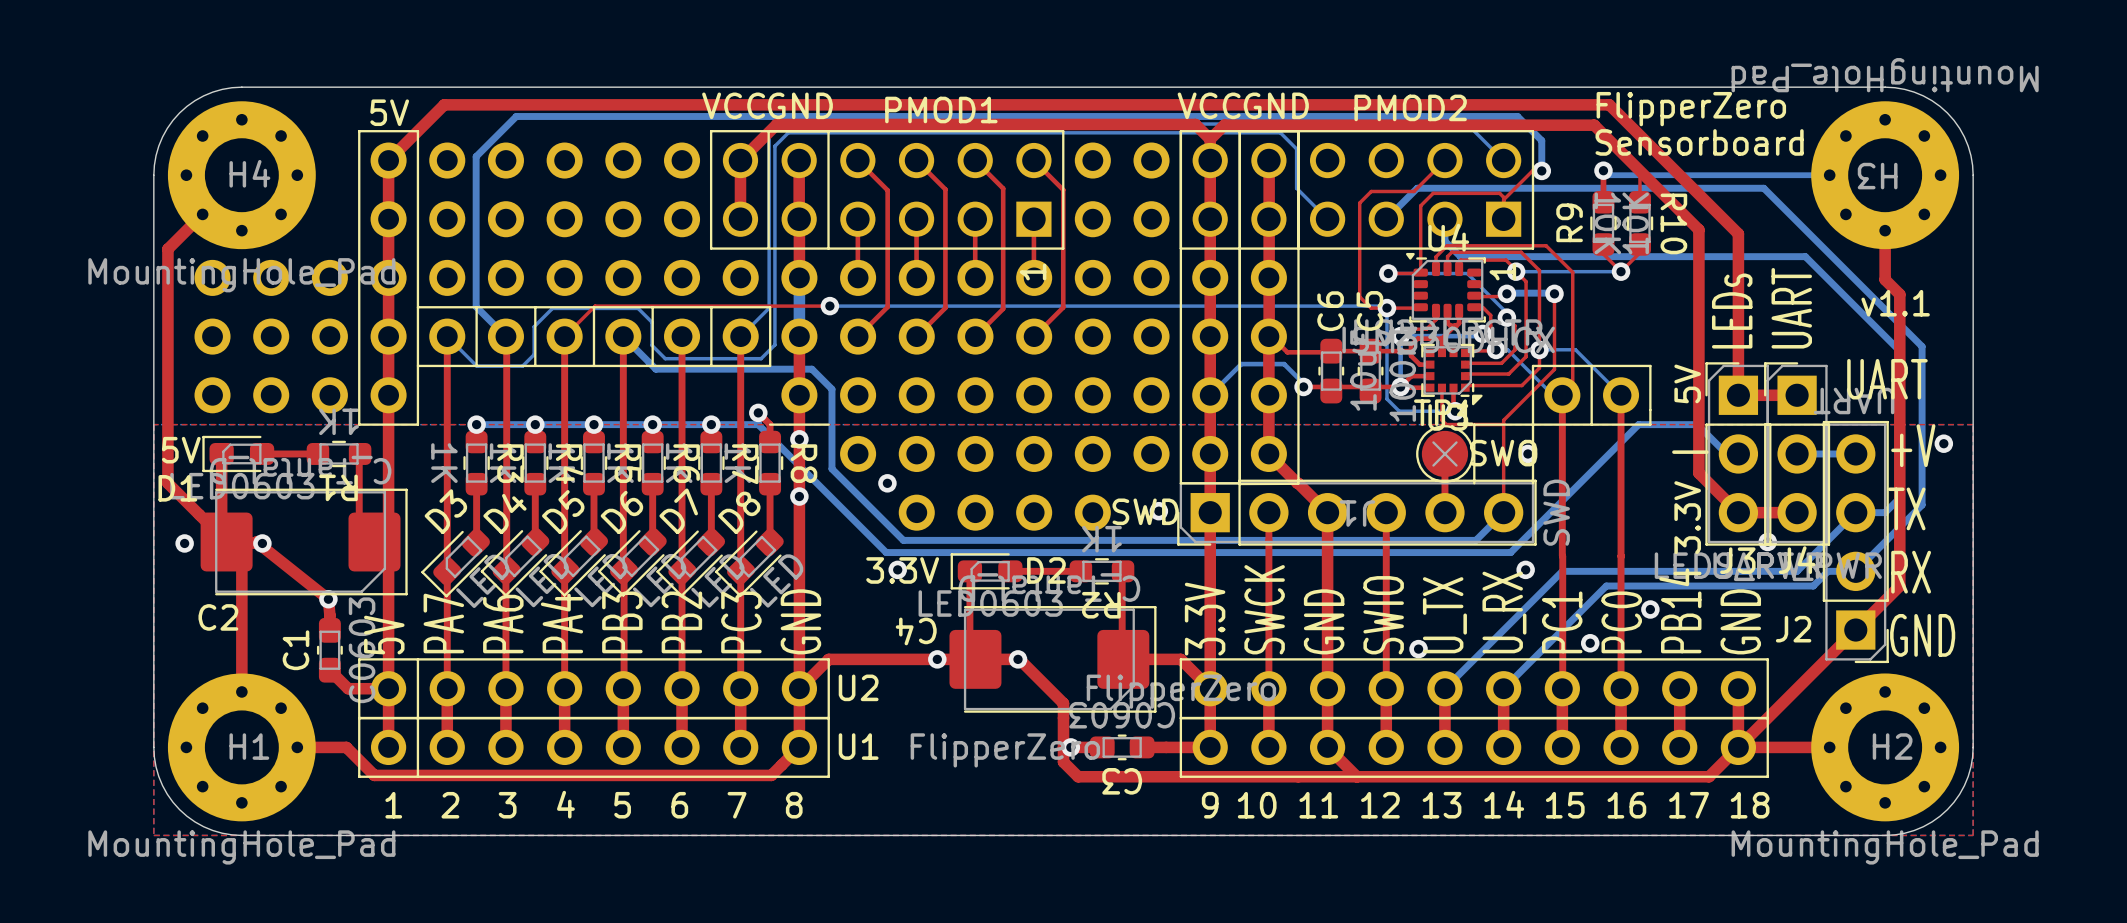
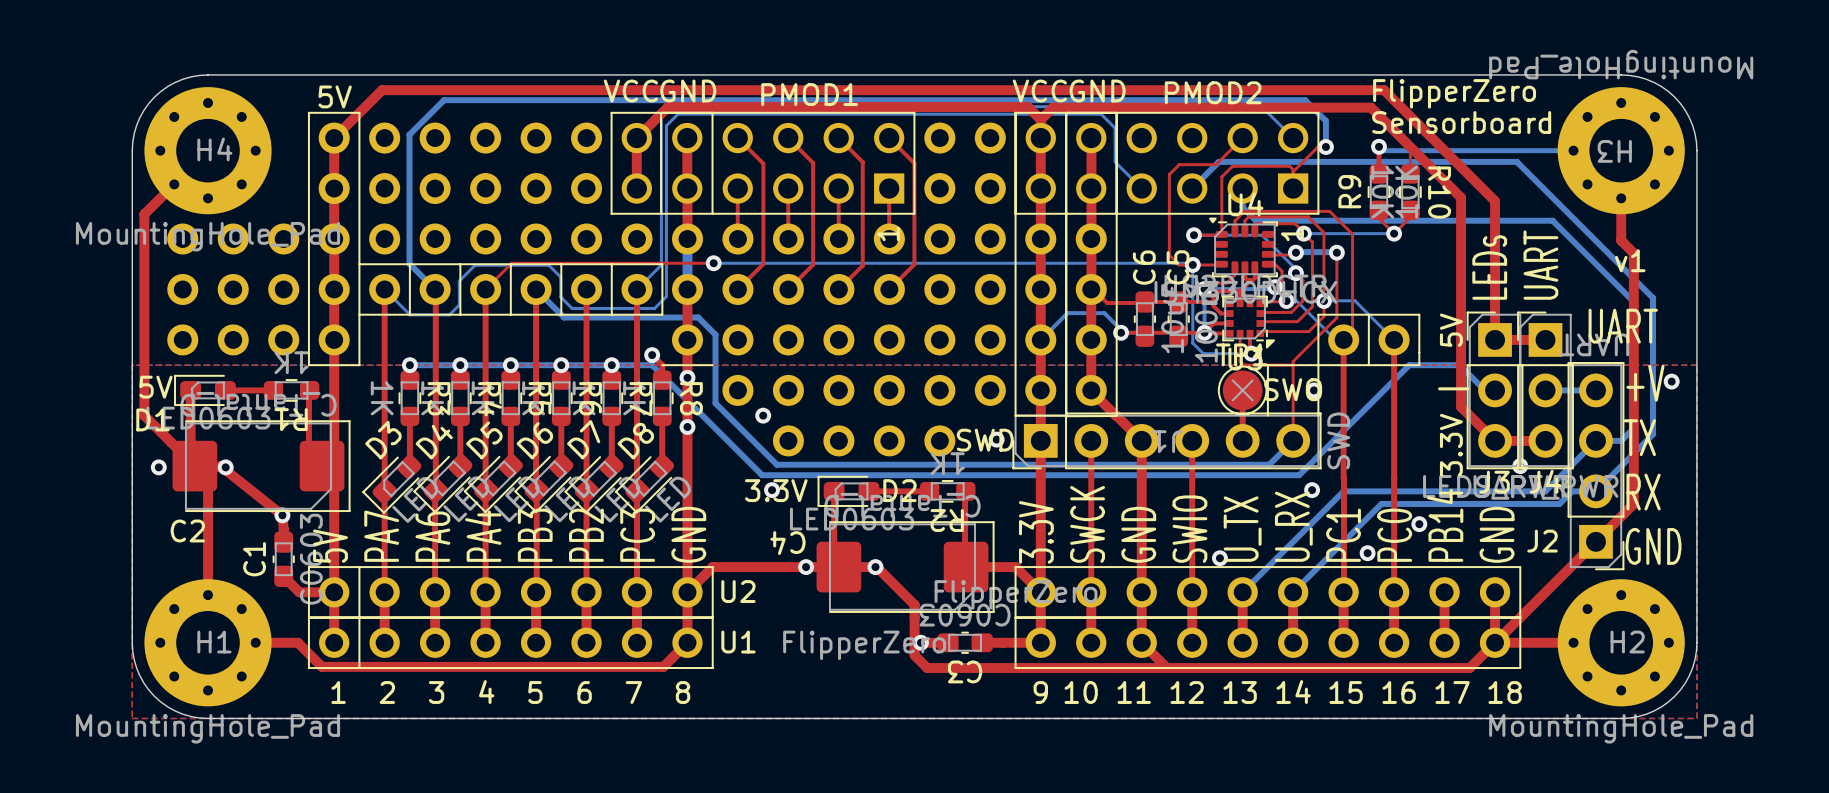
text: v1.1 (1895, 303) -> v1 (1630, 260)

